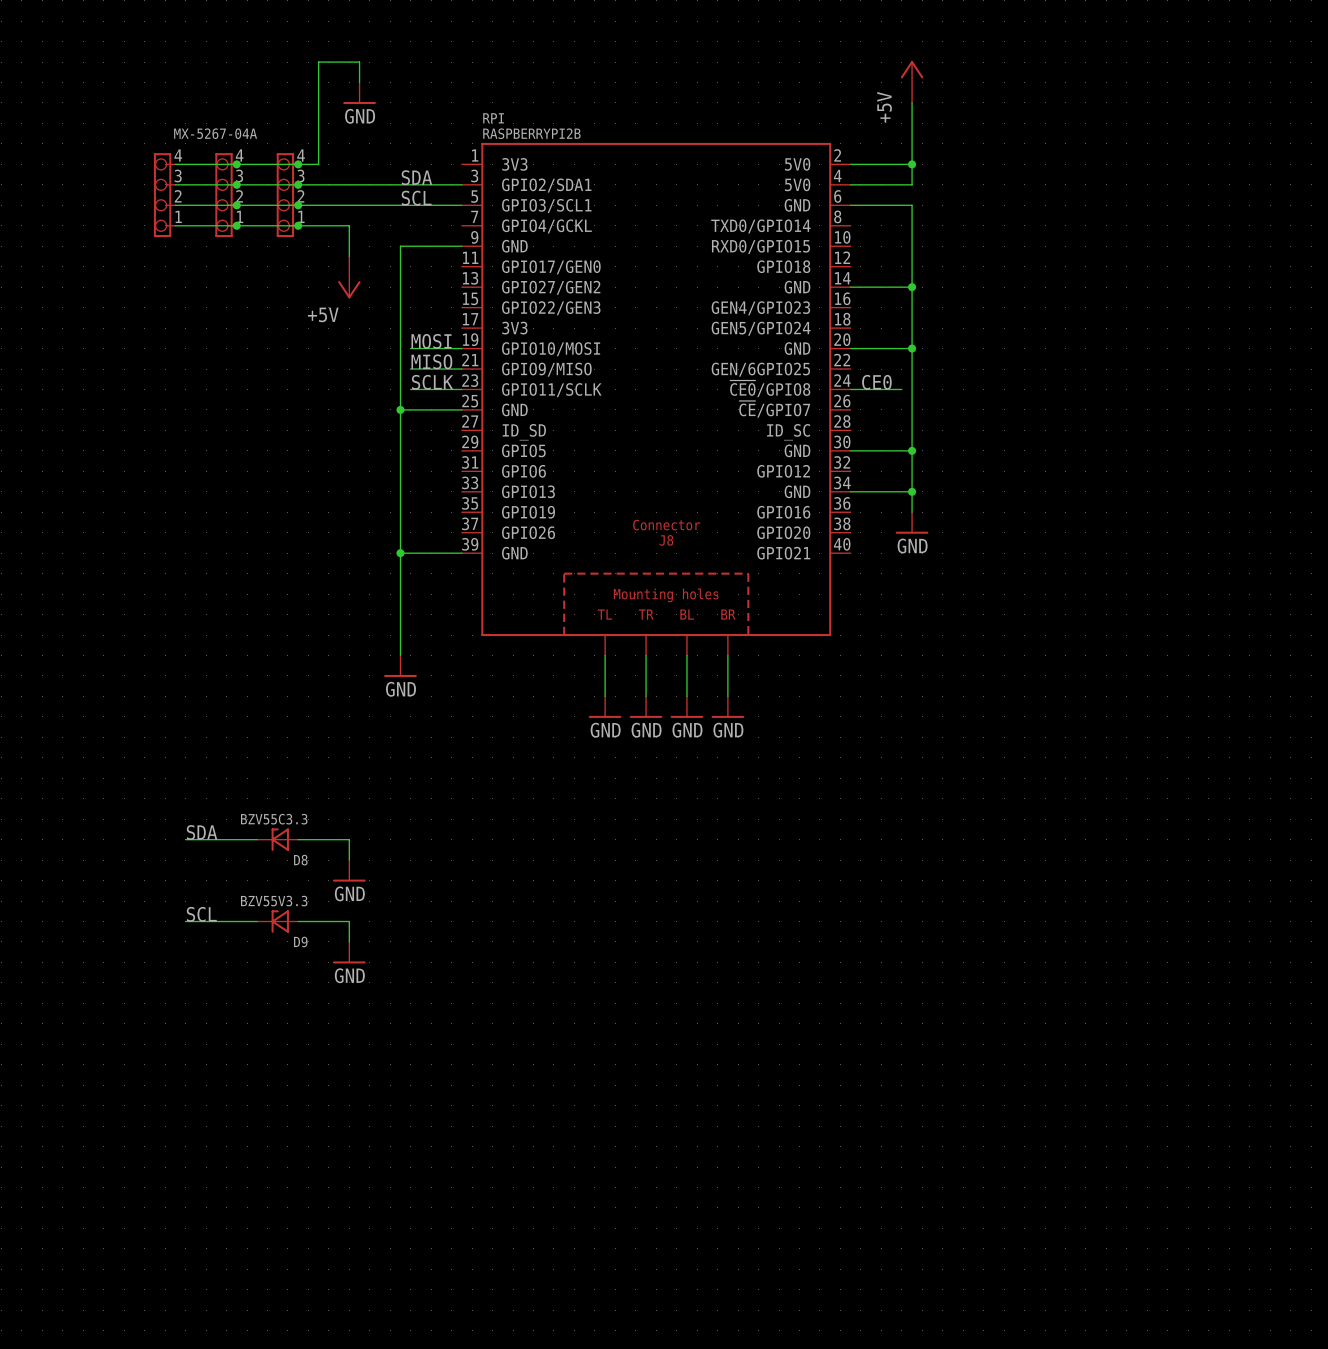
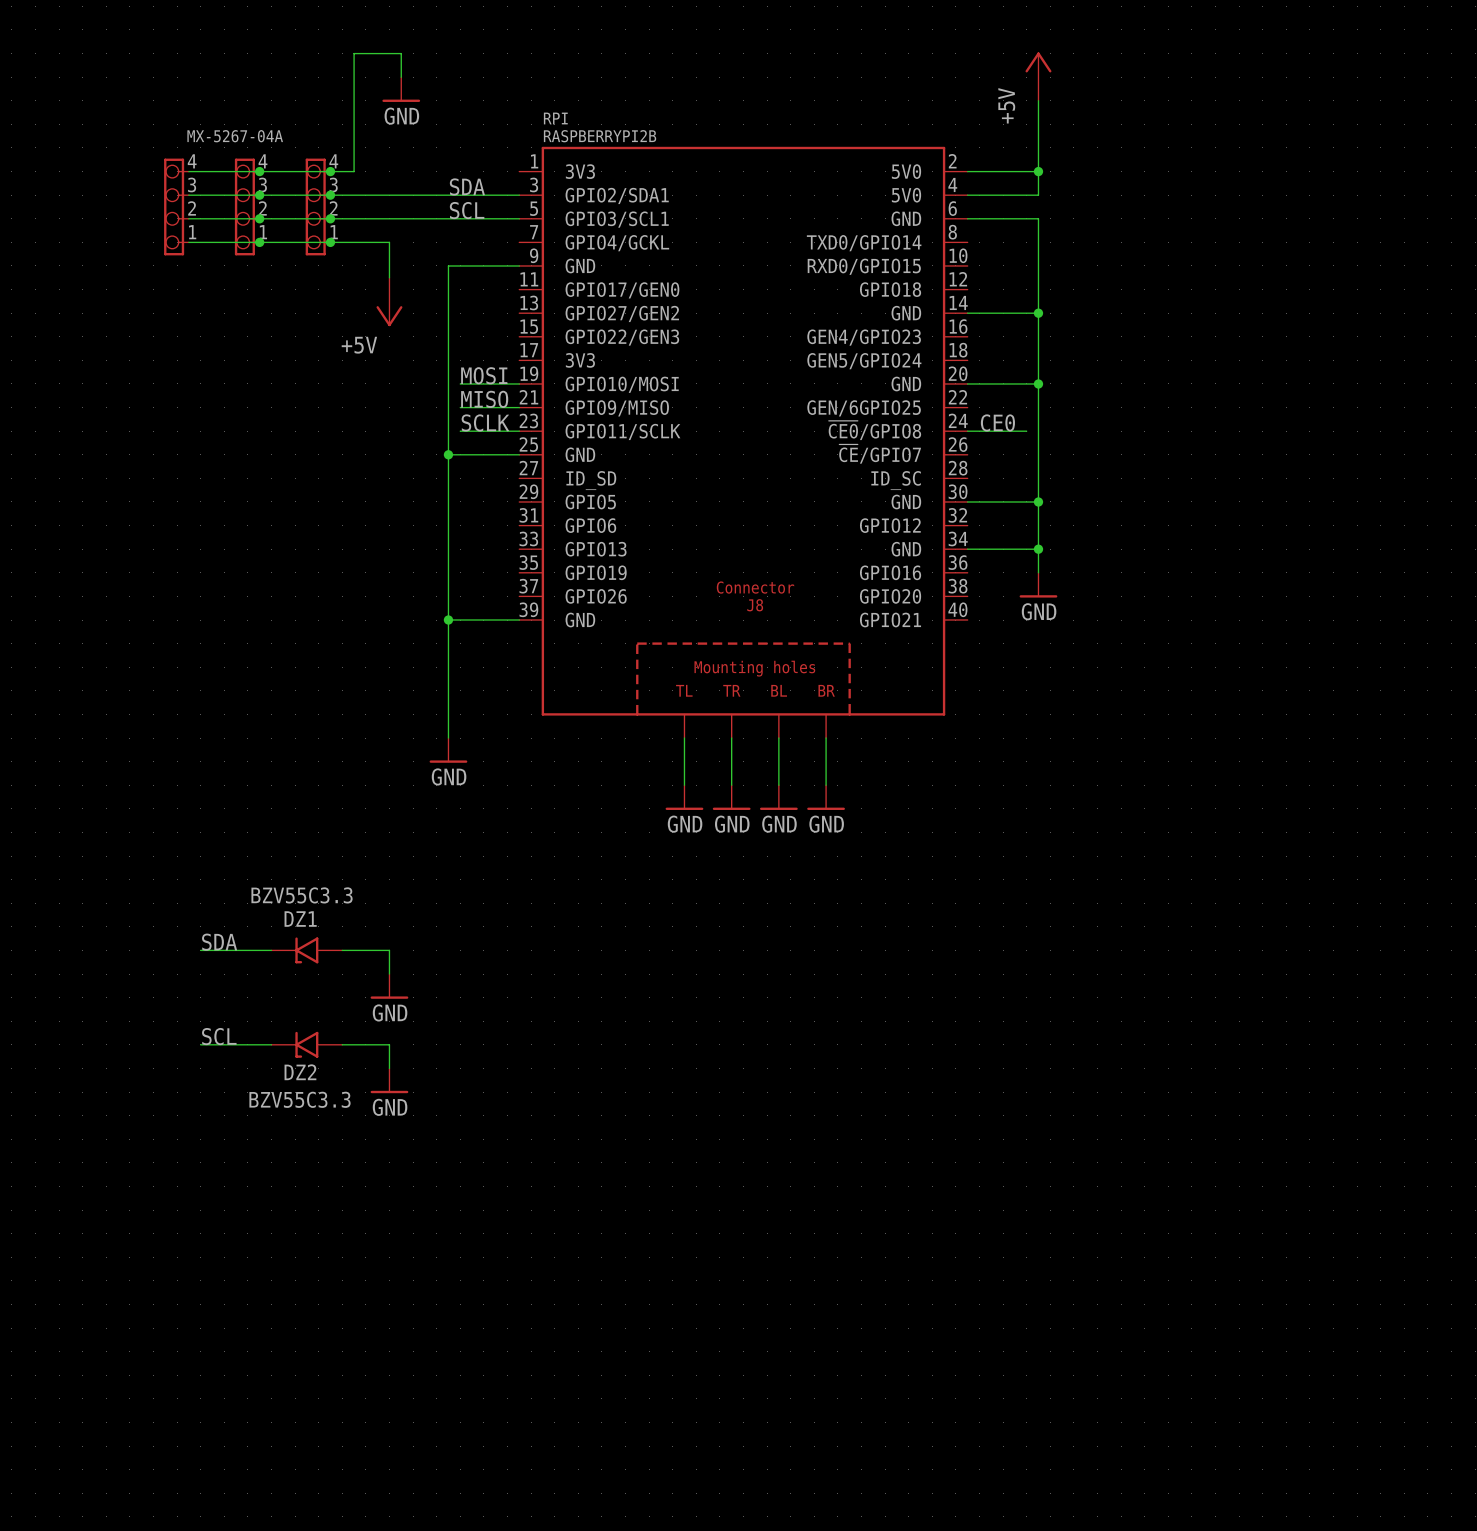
D8: BZV55C3.3 (277, 839) -> none
DZ1: none -> BZV55C3.3 (306, 950)
D9: BZV55V3.3 (277, 921) -> none
DZ2: none -> BZV55C3.3 (306, 1044)

